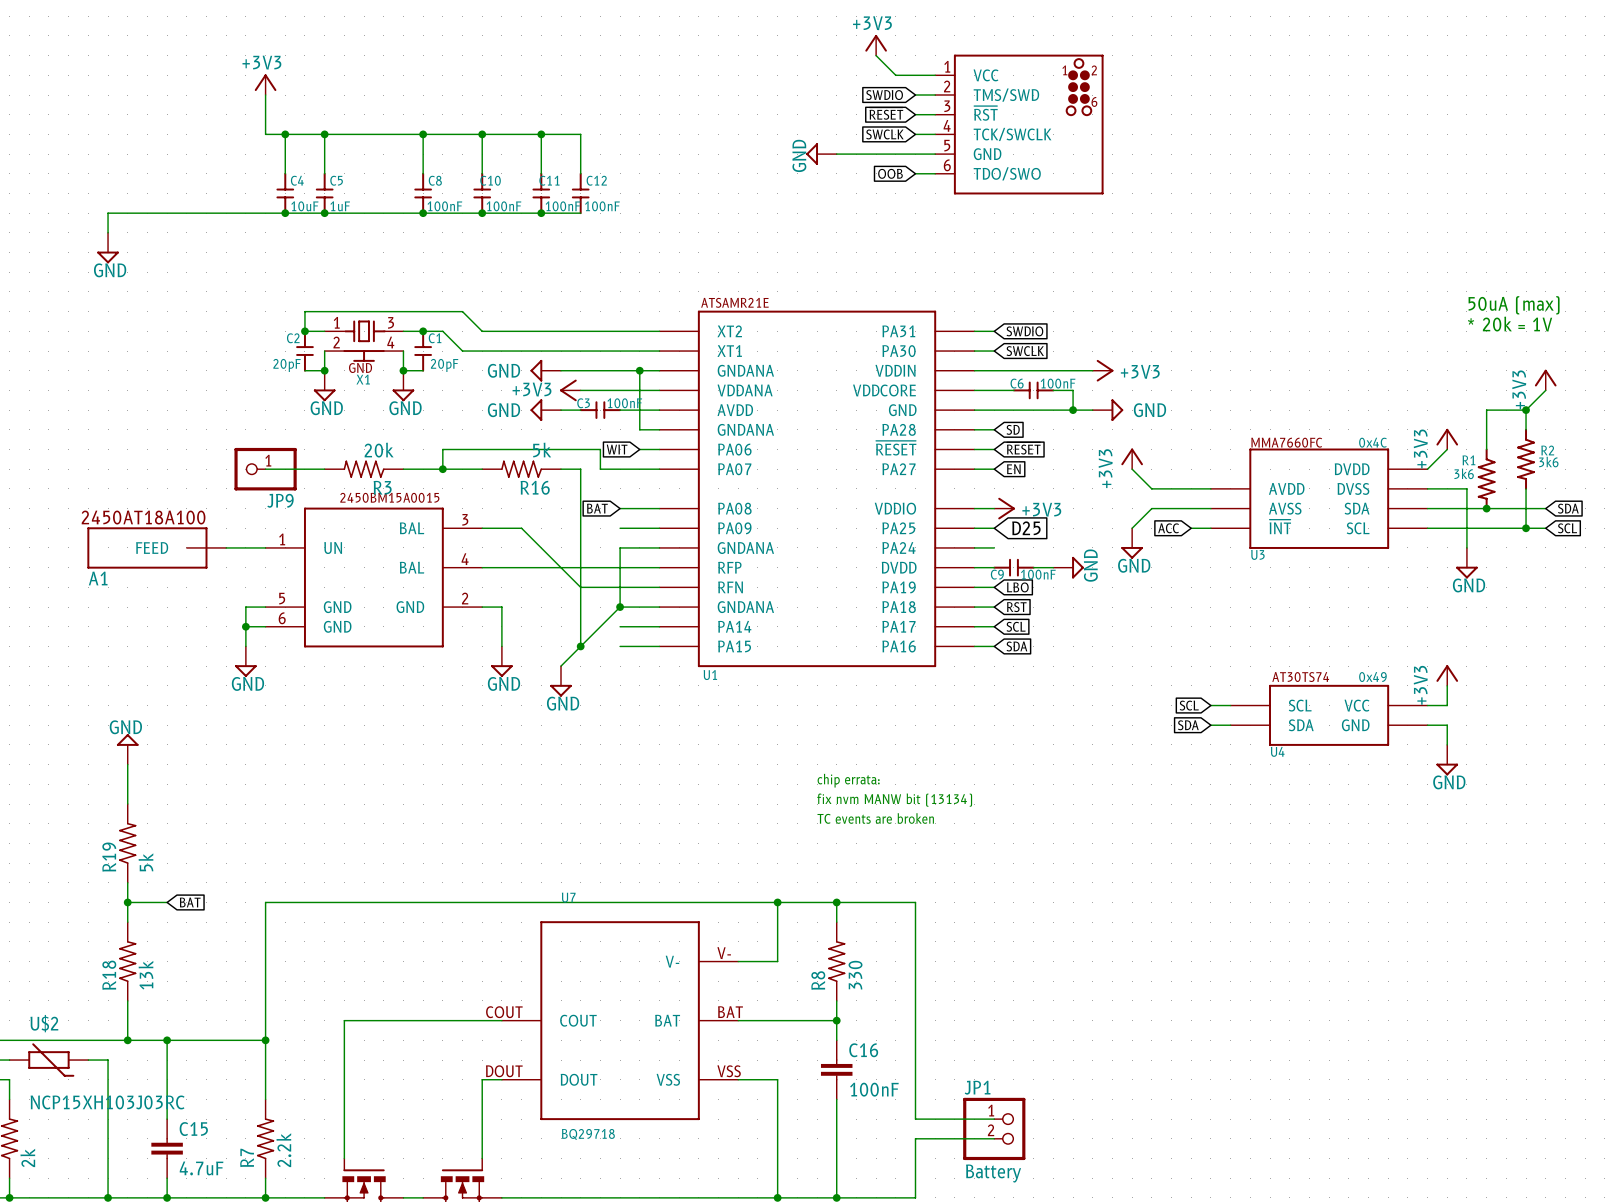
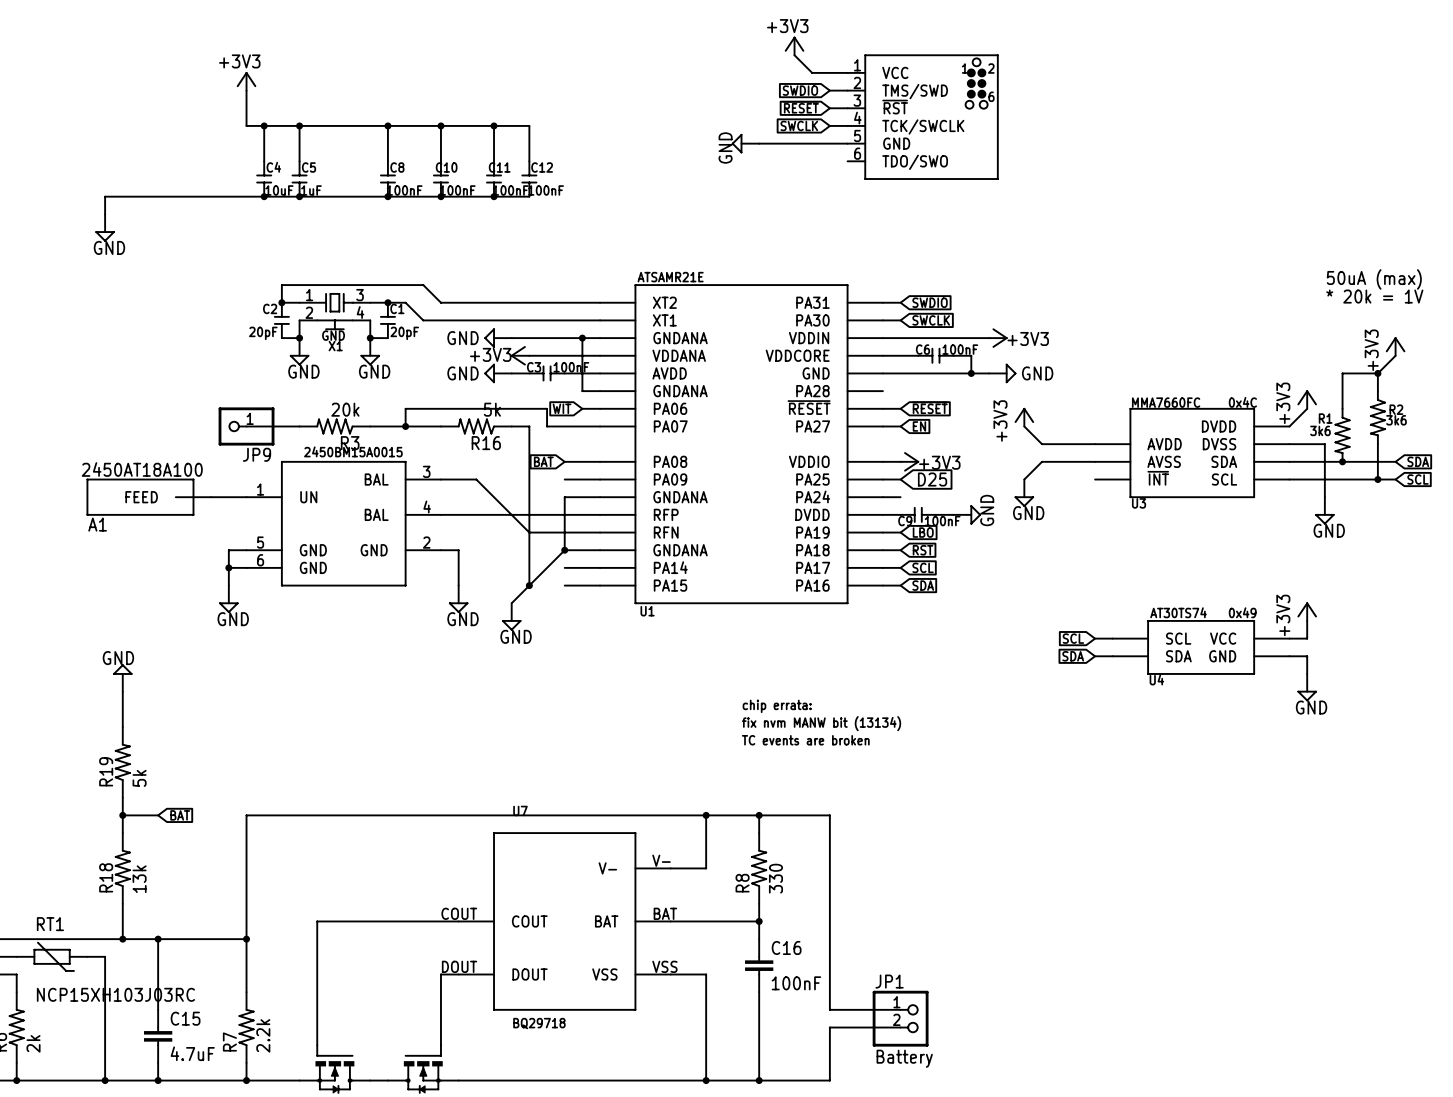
global label: OOB (890, 173) -> none
wire: (915, 173) (935, 173) -> none
wire: (974, 429) (994, 429) -> none
global label: SD (1013, 429) -> none
global label: ACC (1168, 528) -> none
wire: (1191, 528) (1210, 528) -> none
U$2 name: U$2 (44, 1023) -> RT1 (50, 924)

